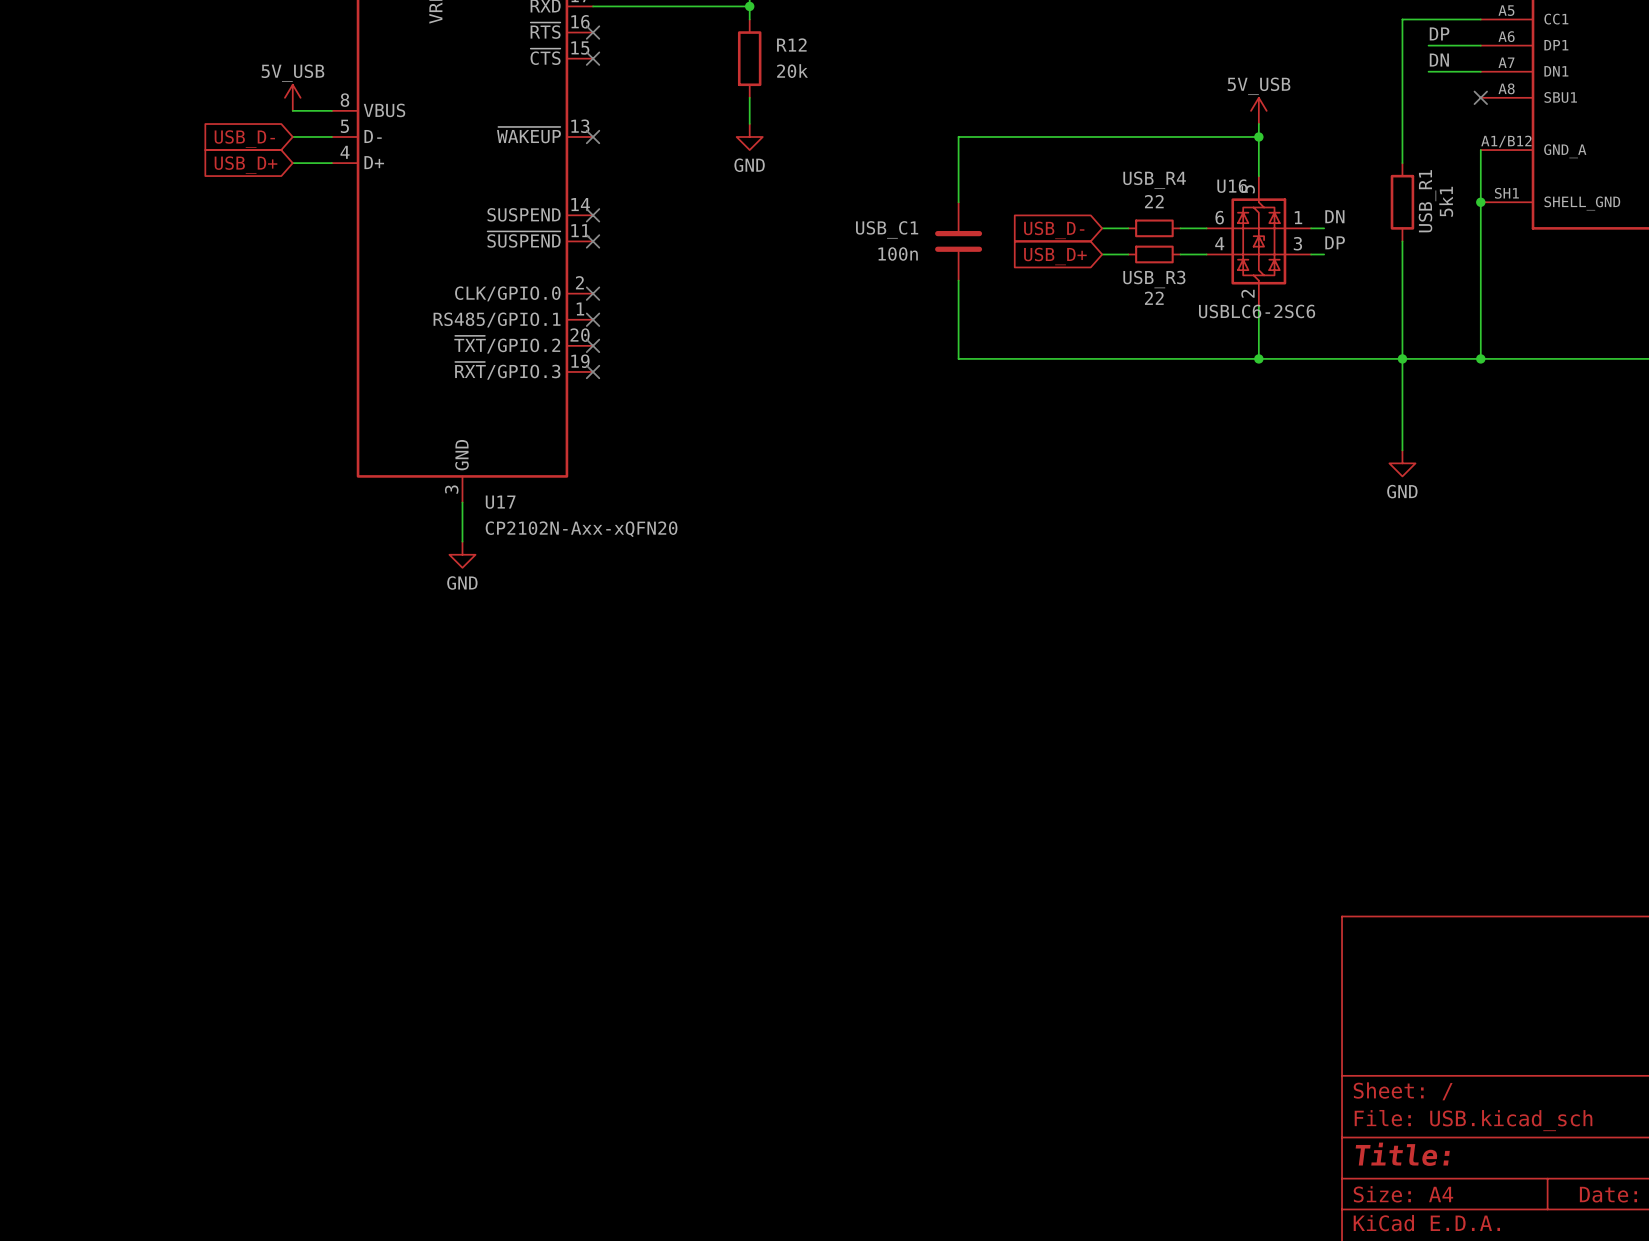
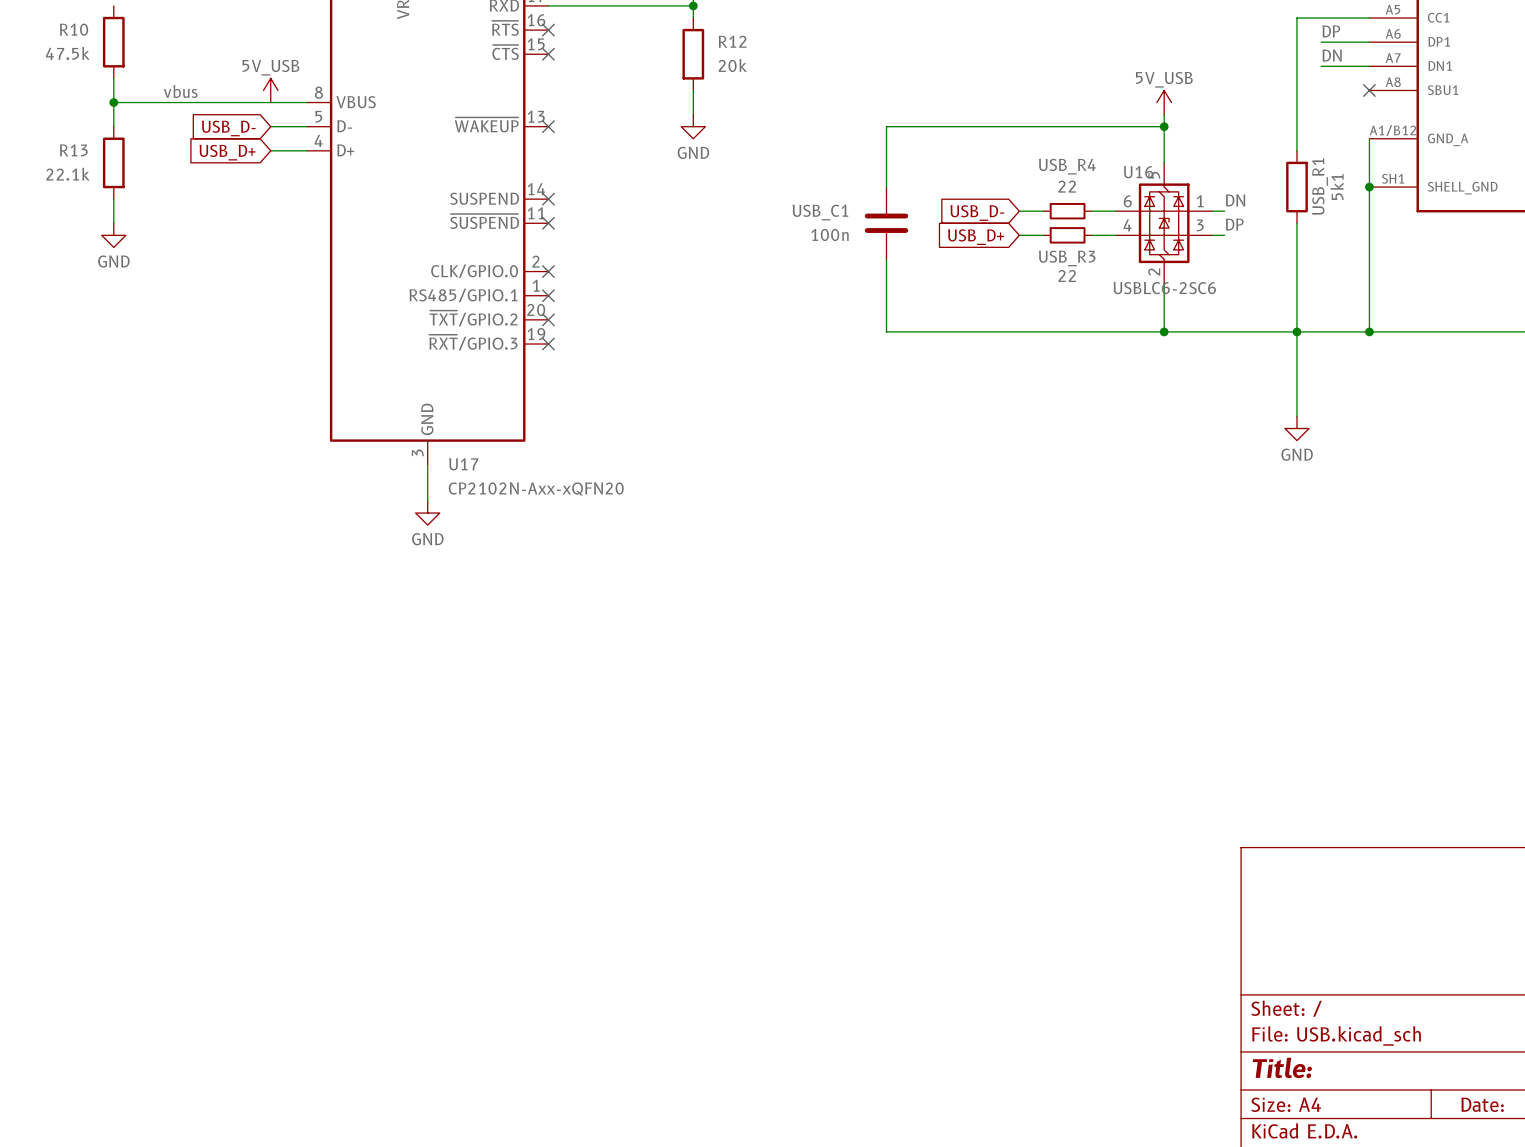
R10: none -> 47.5k (113, 42)
wire: none -> (113, 78) (113, 126)
label: none -> vbus (180, 91)
wire: none -> (113, 102) (270, 102)
junction: none -> (113, 102)
R13: none -> 22.1k (113, 162)
wire: none -> (113, 199) (113, 223)
power symbol: none -> GND (113, 235)

